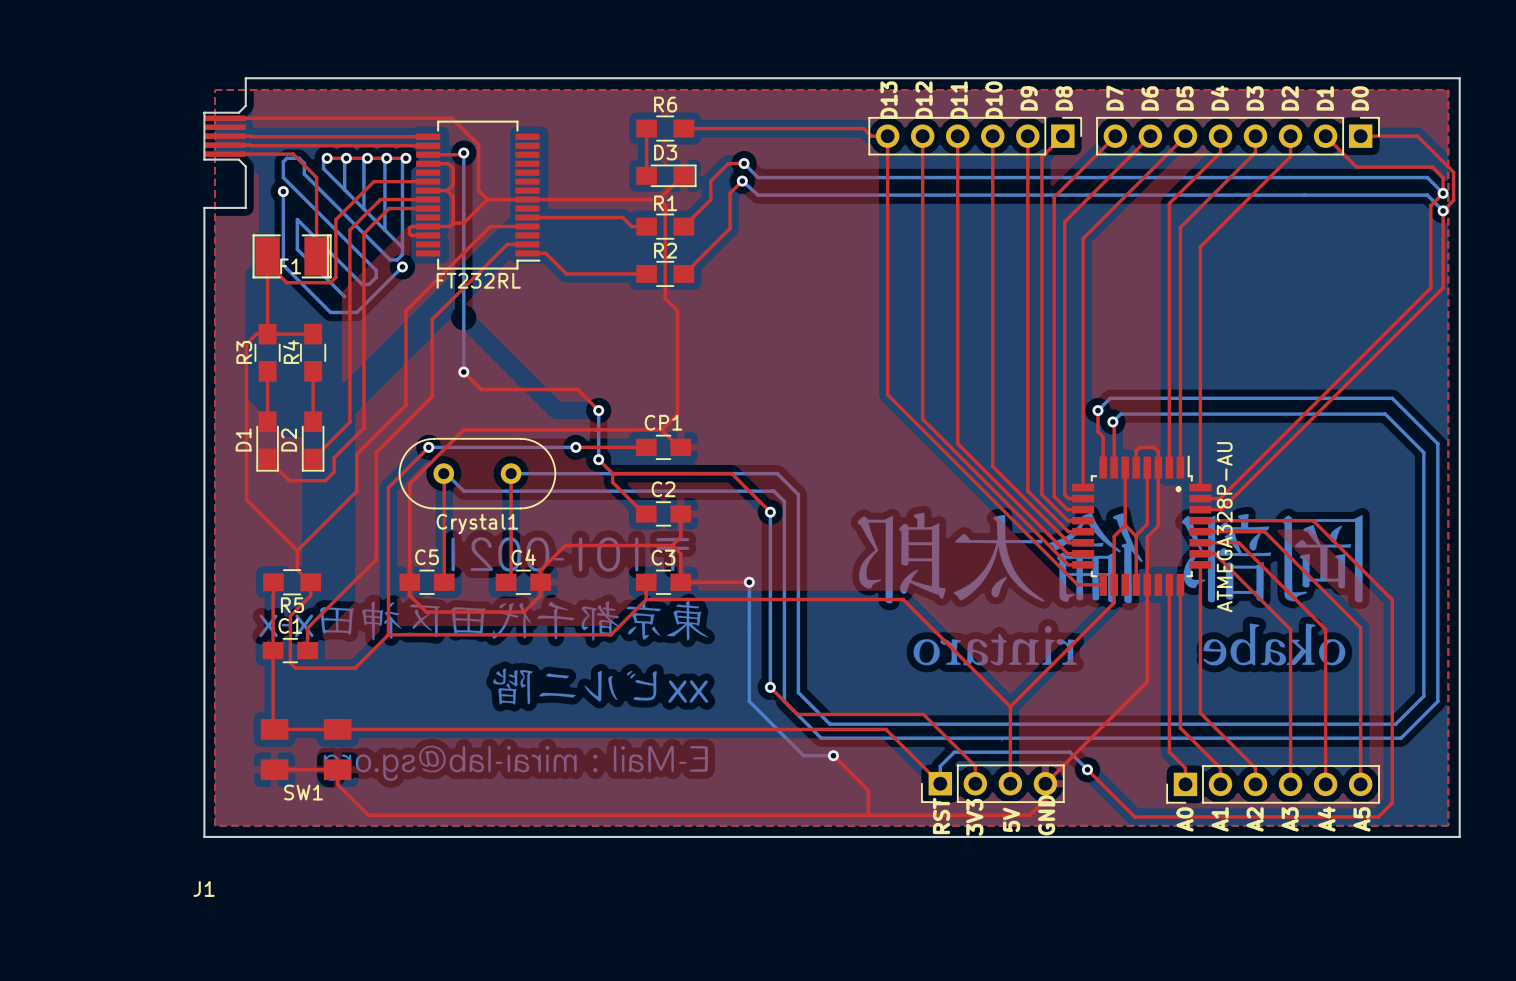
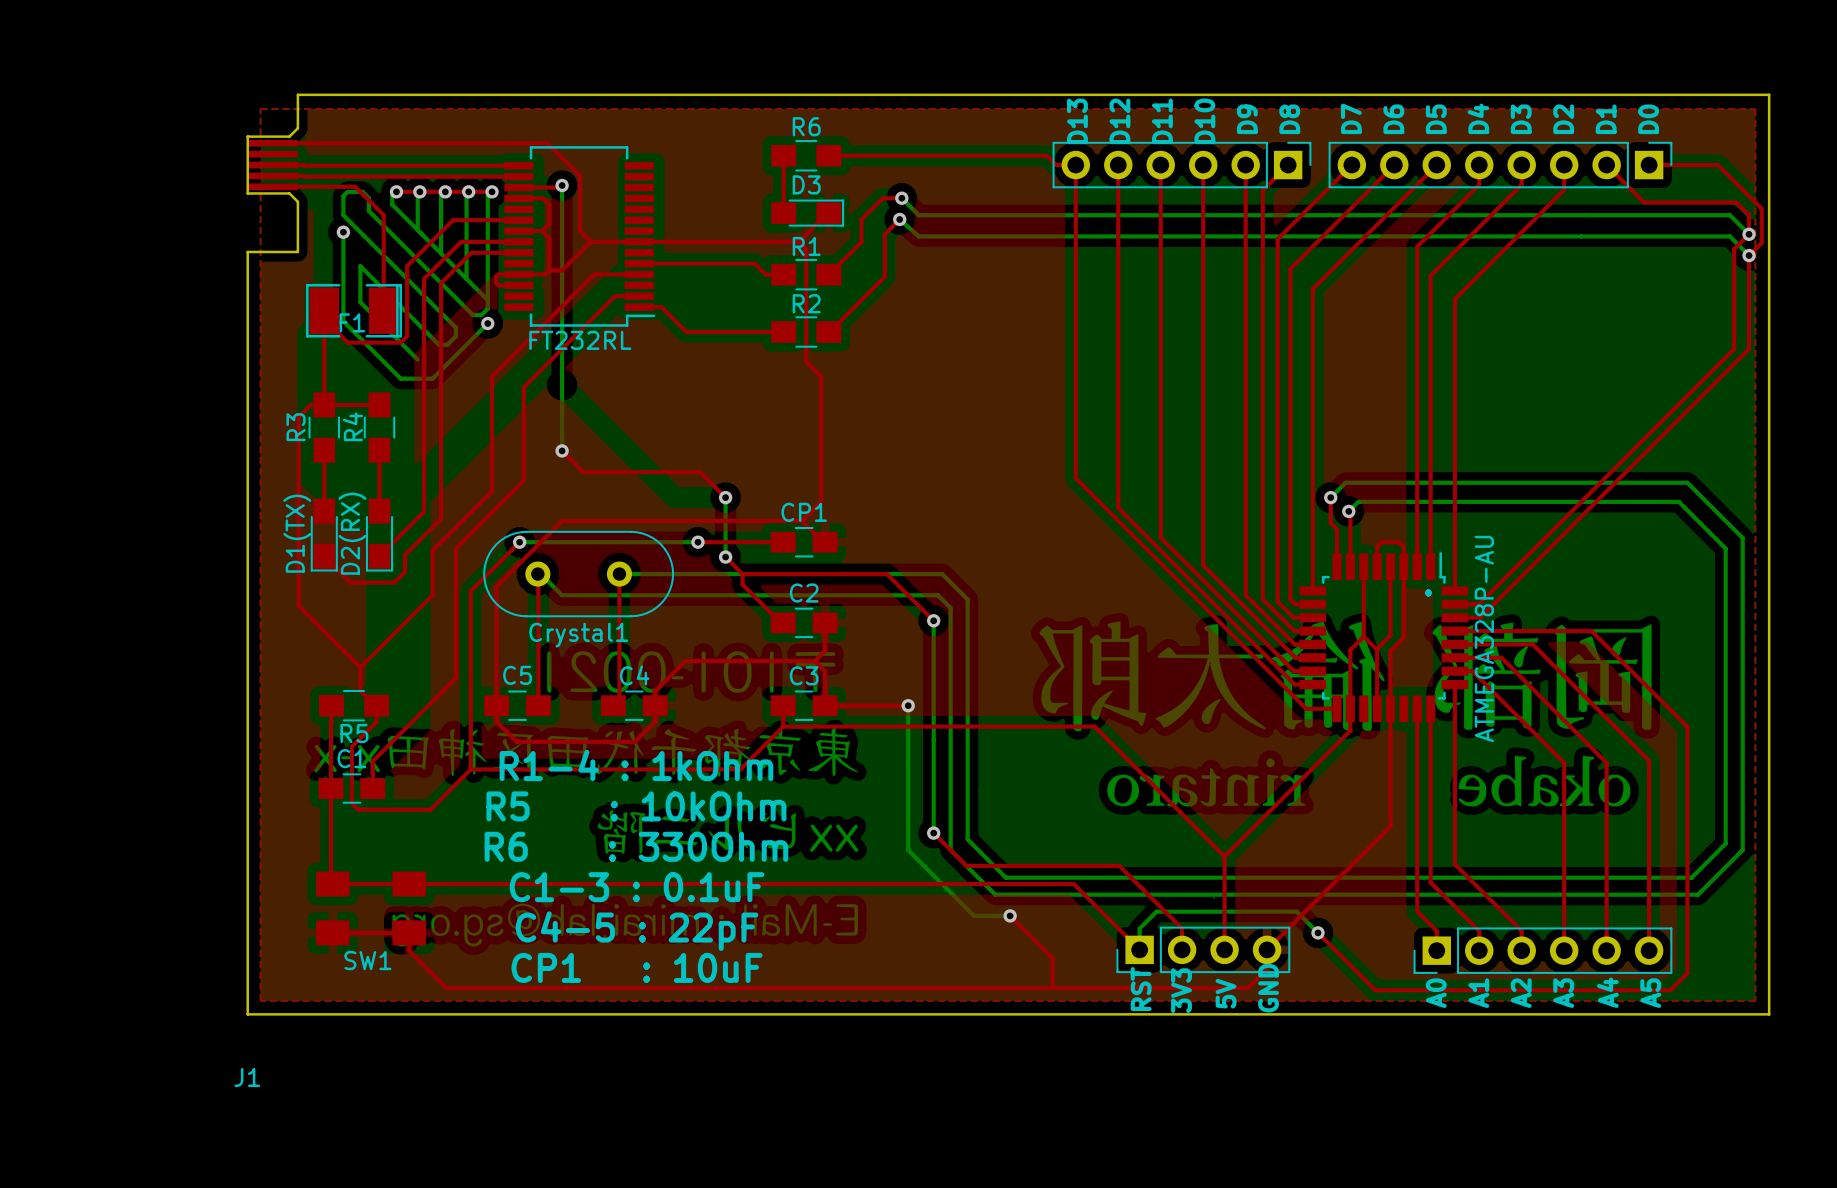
D1 name: D1 (243, 440) -> D1(TX) (297, 533)
D2 name: D2 (289, 440) -> D2(RX) (352, 533)
text: none -> R1-4 : 1kOhm (636, 765)
text: none -> R5 : 10kOhm (636, 806)
text: none -> R6 : 330Ohm (636, 846)
text: none -> C1-3 : 0.1uF (637, 887)
text: none -> C4-5 : 22pF (637, 931)
text: none -> CP1 : 10uF (637, 967)

